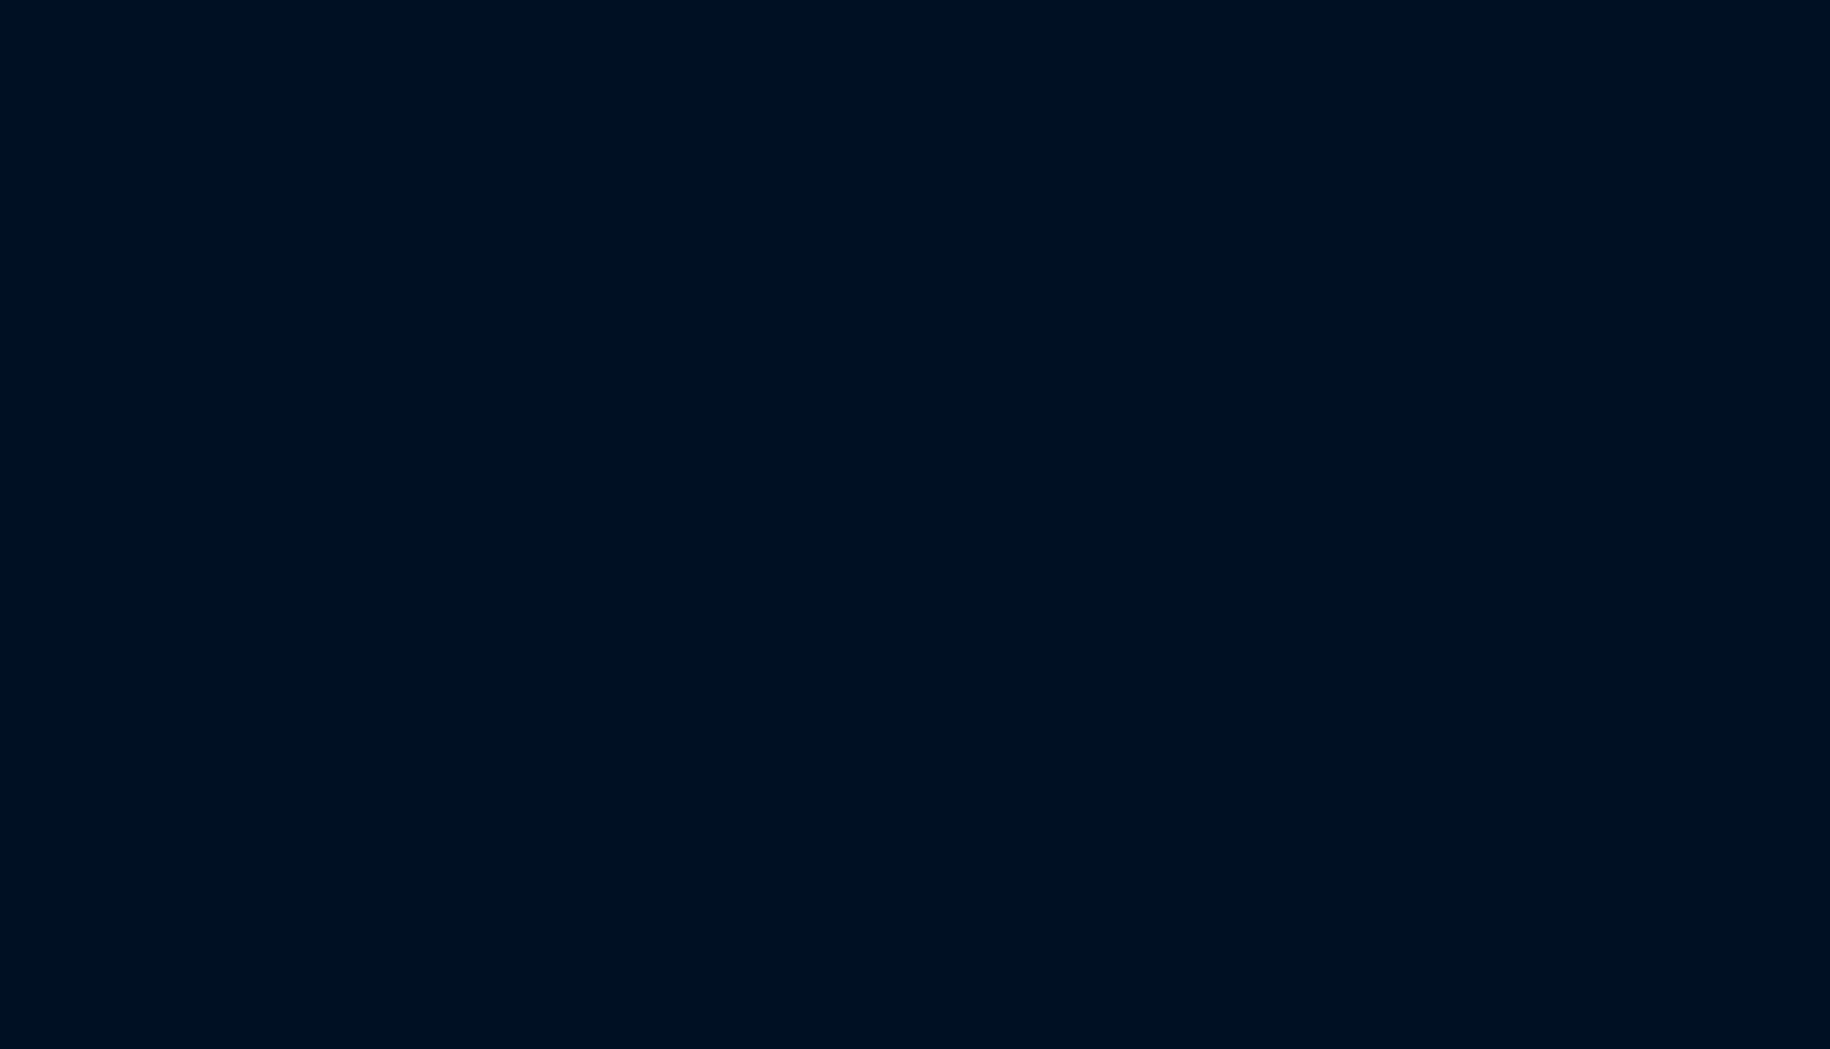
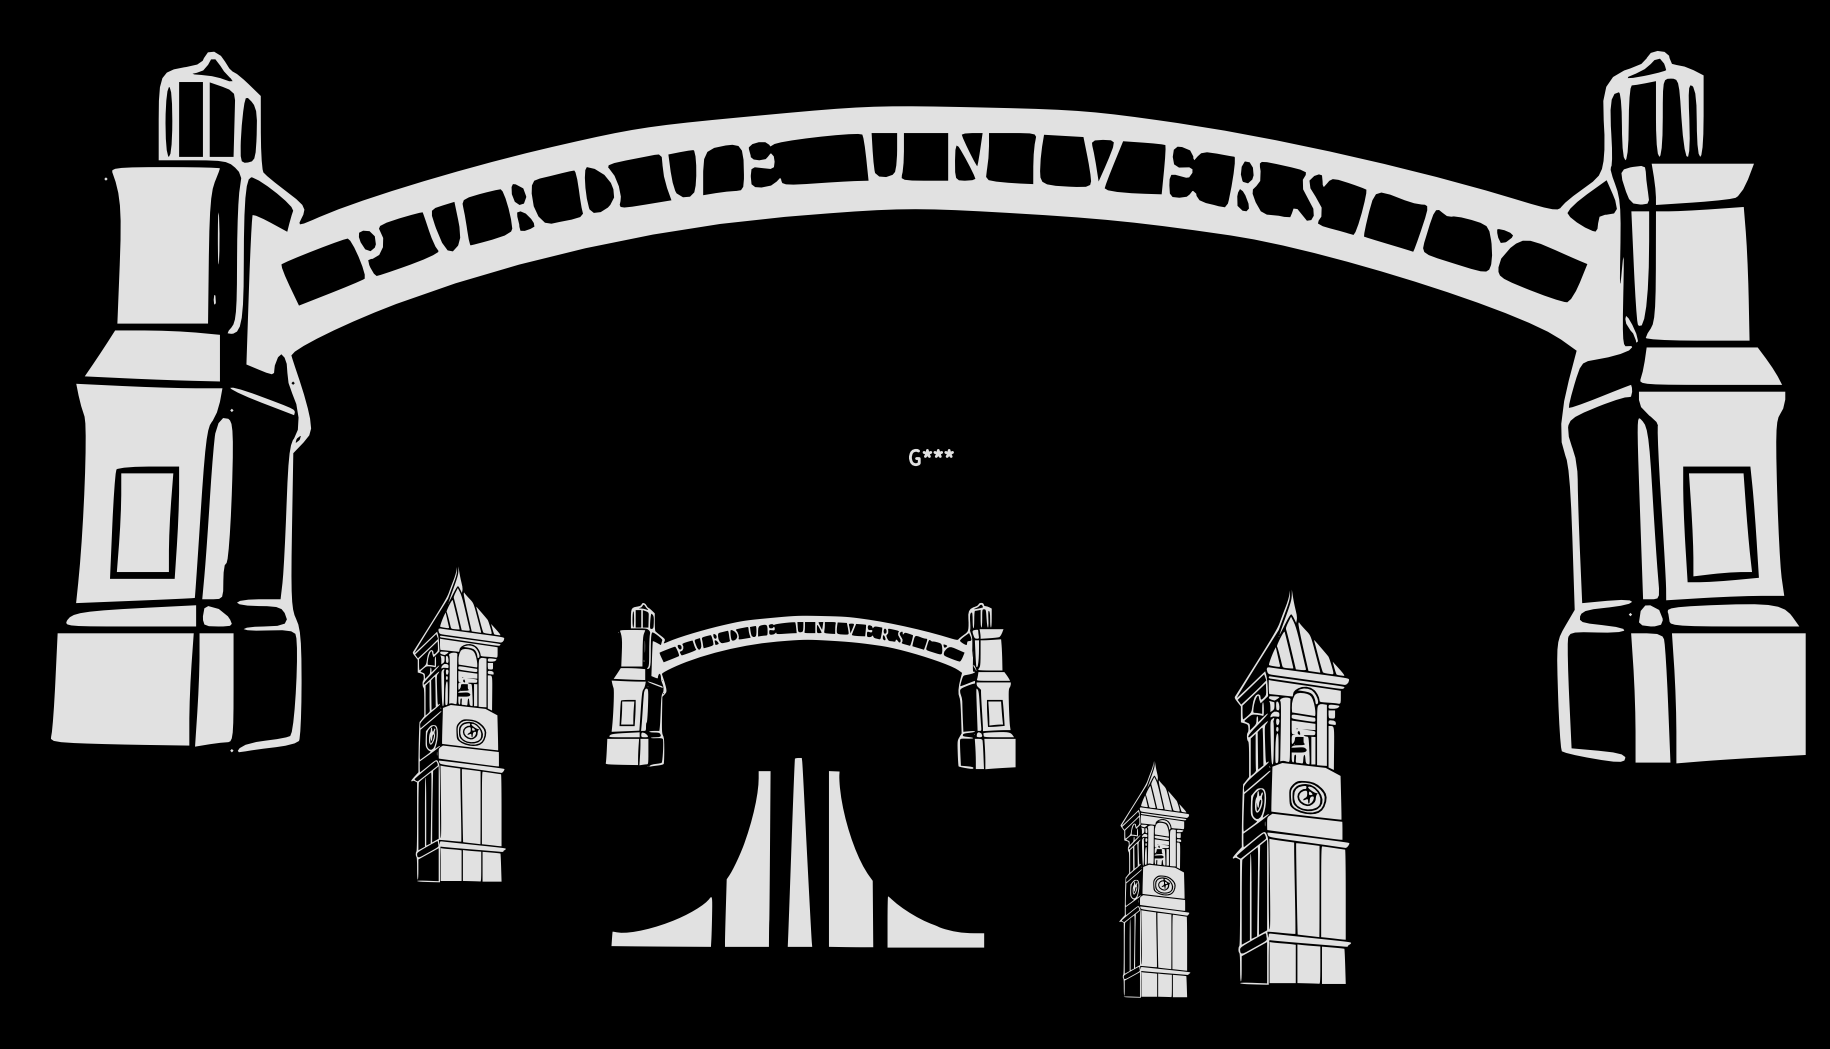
G***: none -> (928, 407)
drawing: none -> [411, 566, 506, 883]
drawing: none -> [1232, 589, 1352, 985]
drawing: none -> [605, 602, 1016, 948]
drawing: none -> [1119, 760, 1191, 998]

